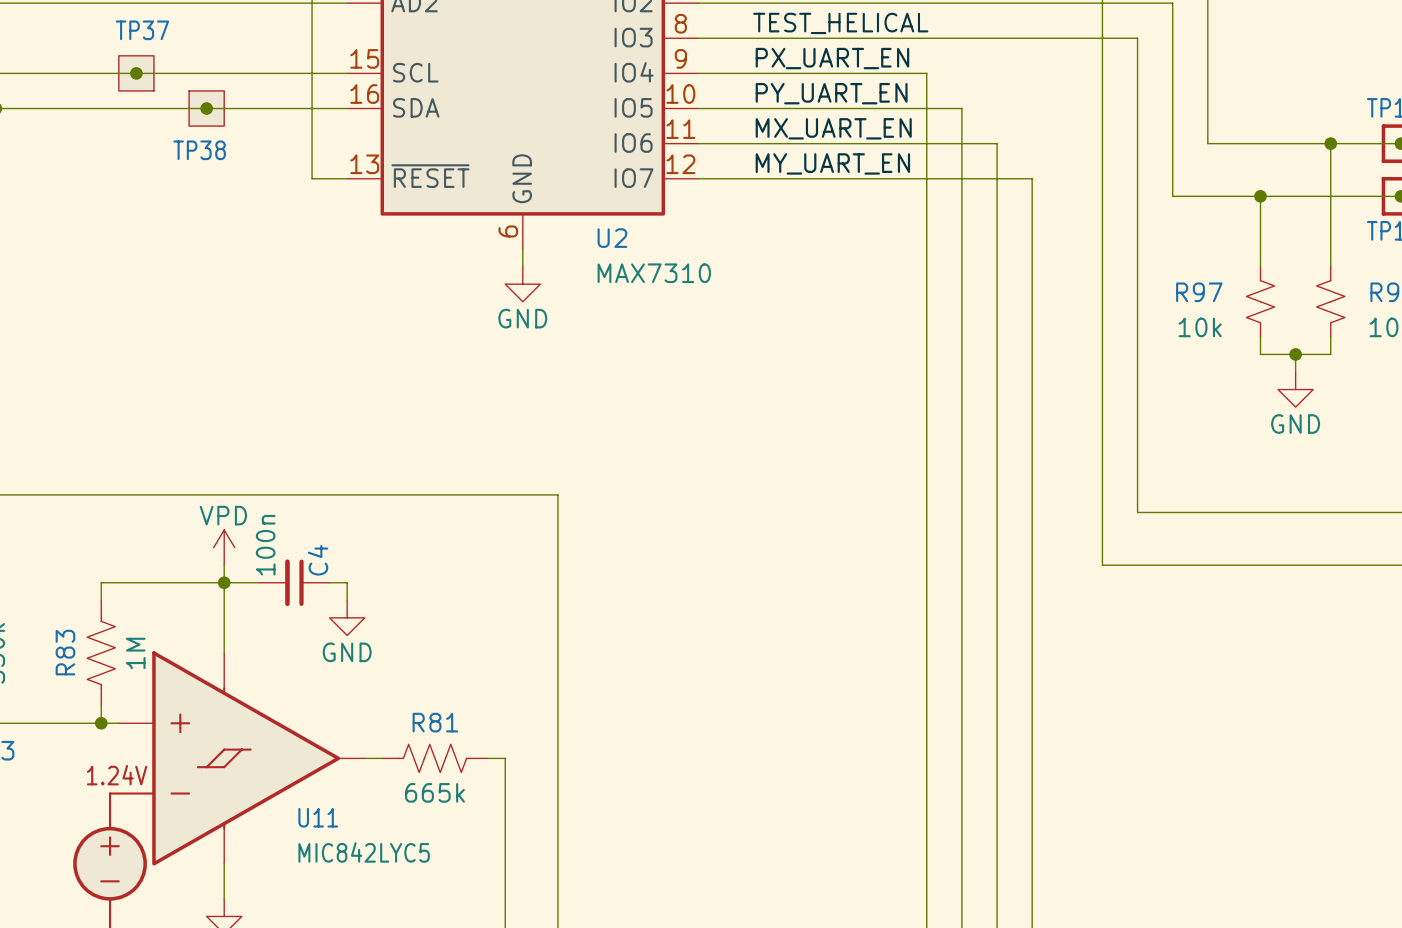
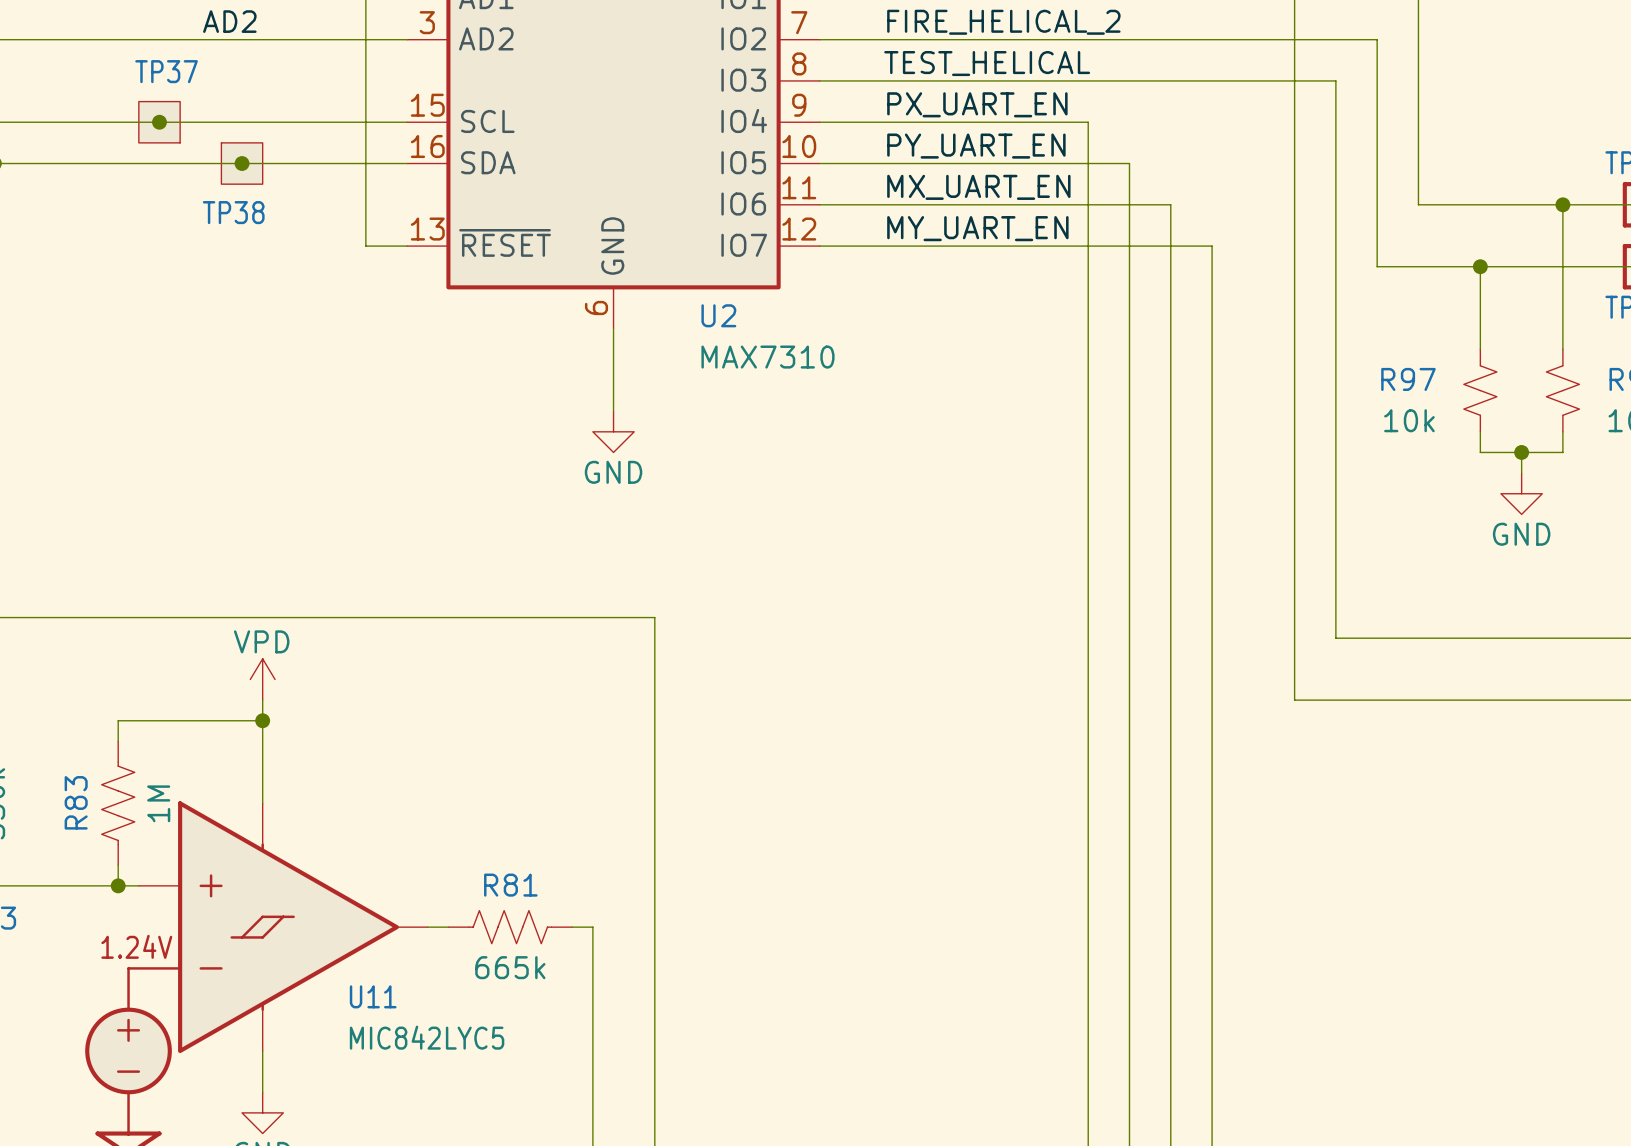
wire: none -> (613, 349) (613, 411)
power symbol position: GND (522, 284) -> GND (613, 431)
wire: (224, 582) (259, 582) -> none
C4: 100n (294, 582) -> none
wire: (329, 582) (347, 582) (347, 600) -> none
power symbol: GND (347, 617) -> none

